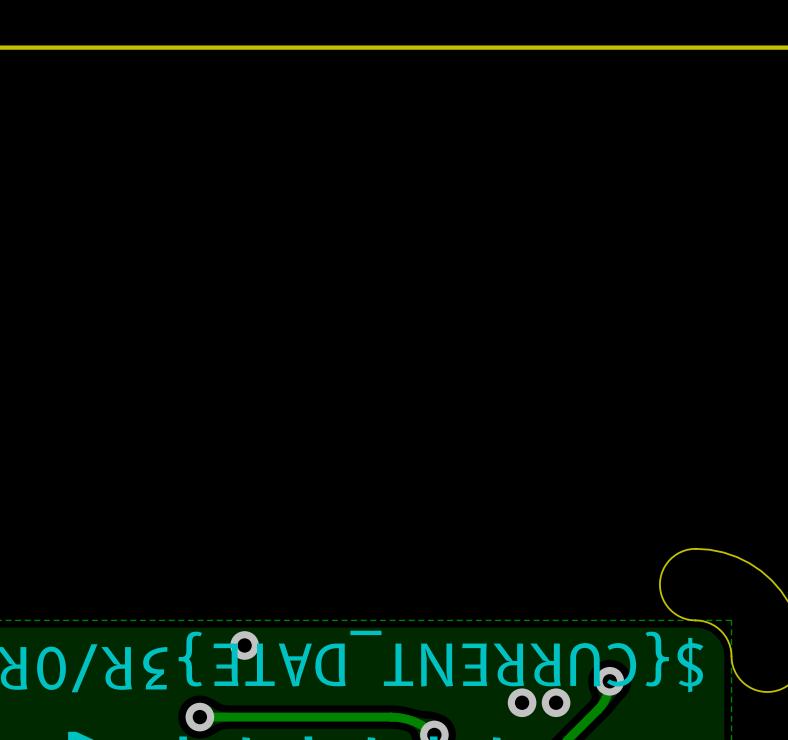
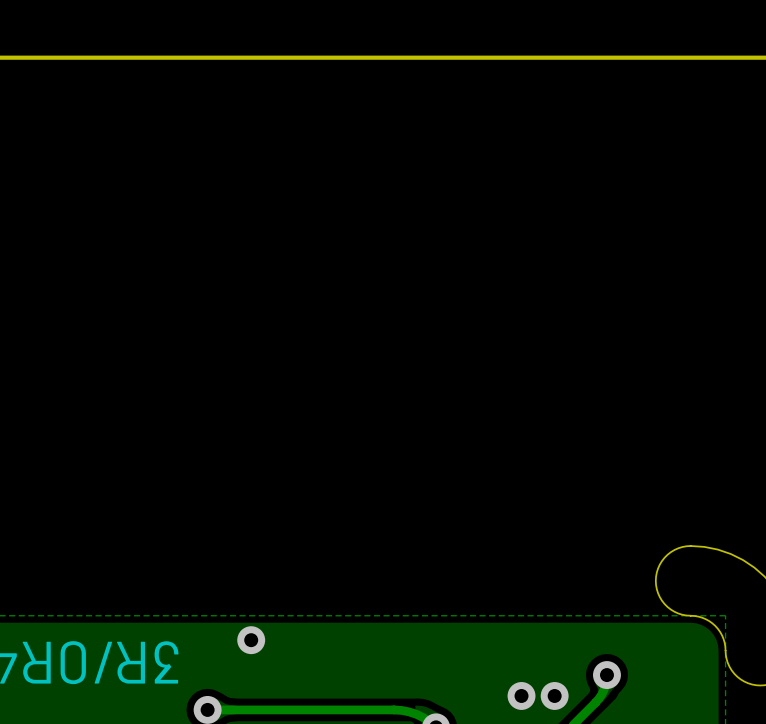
text: ${CURRENT_DATE} (441, 661) -> none

